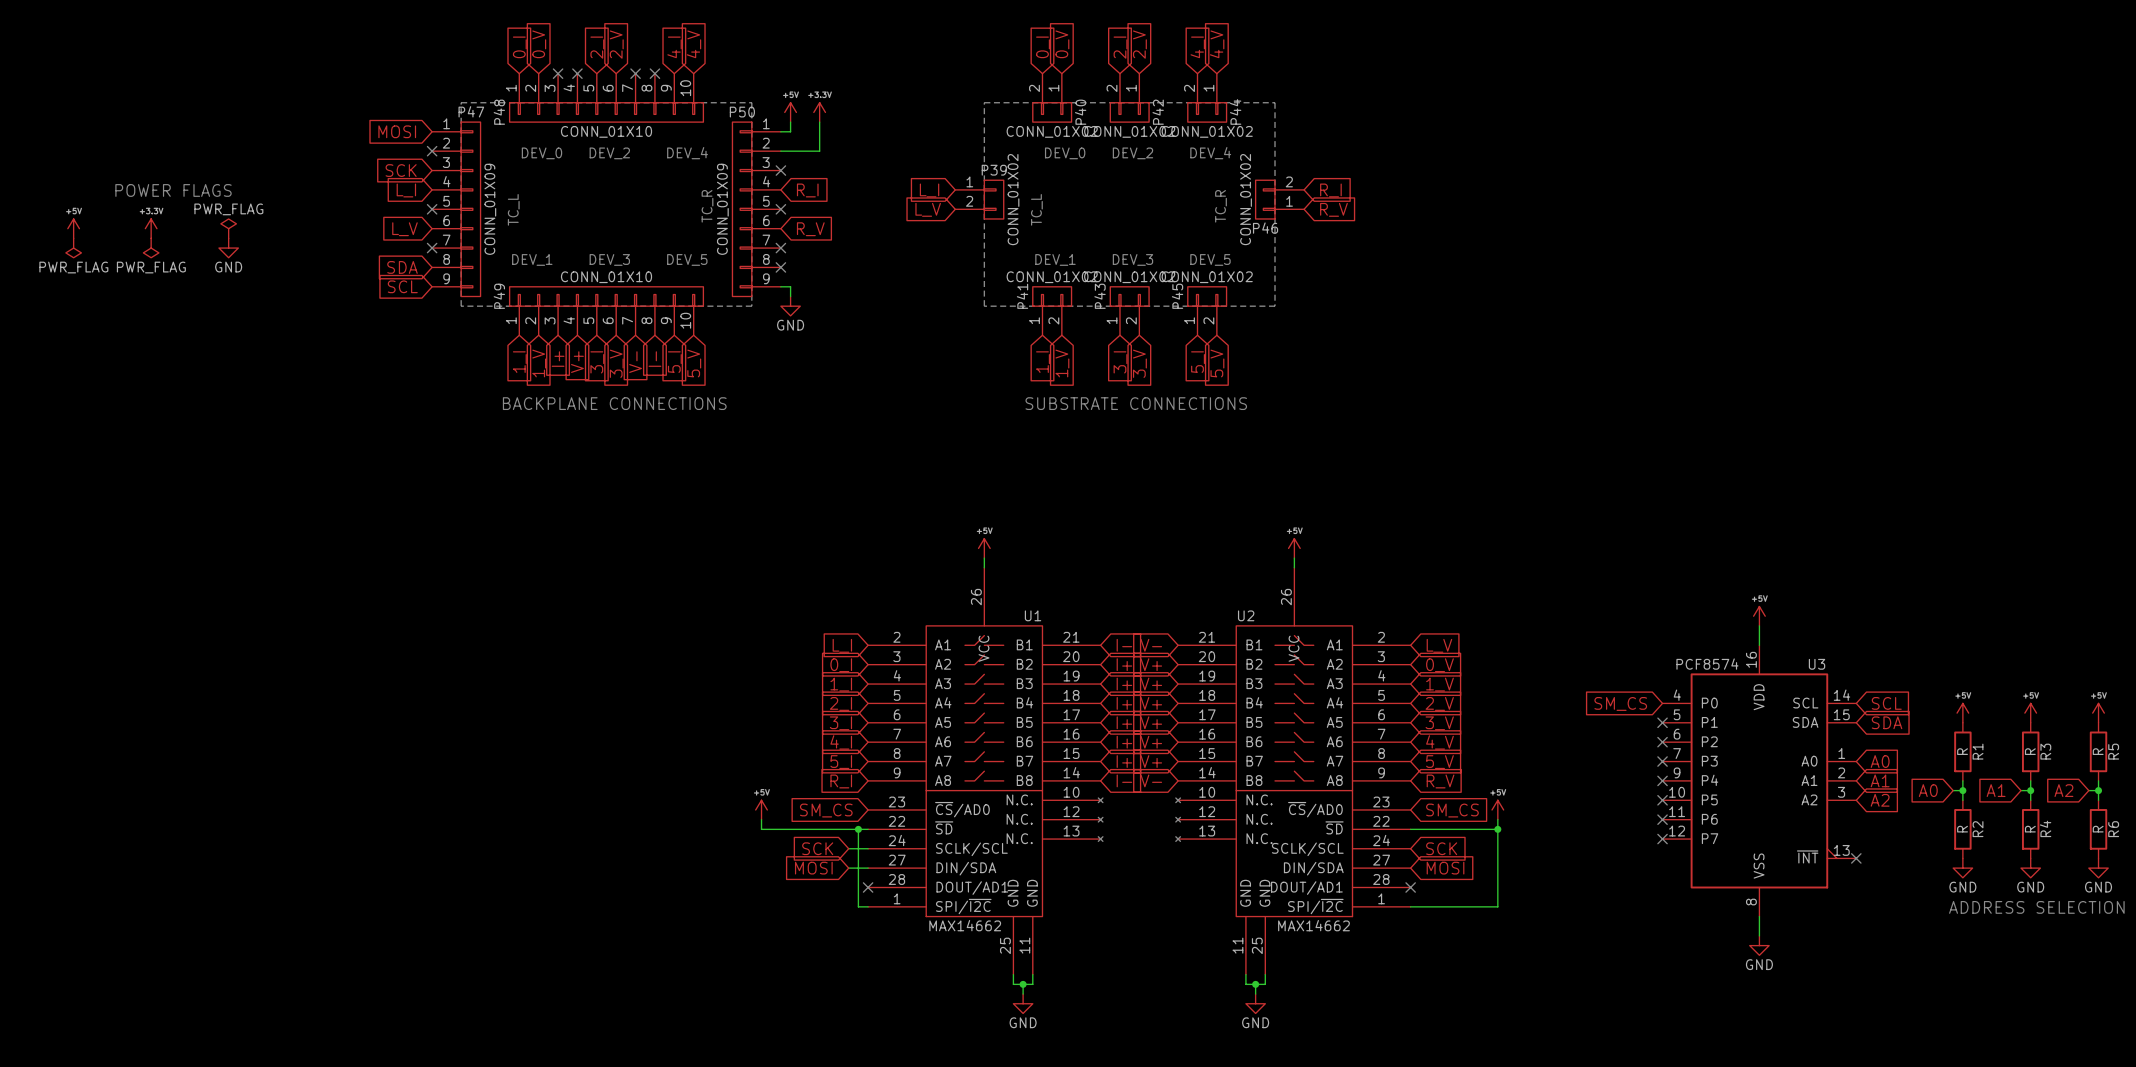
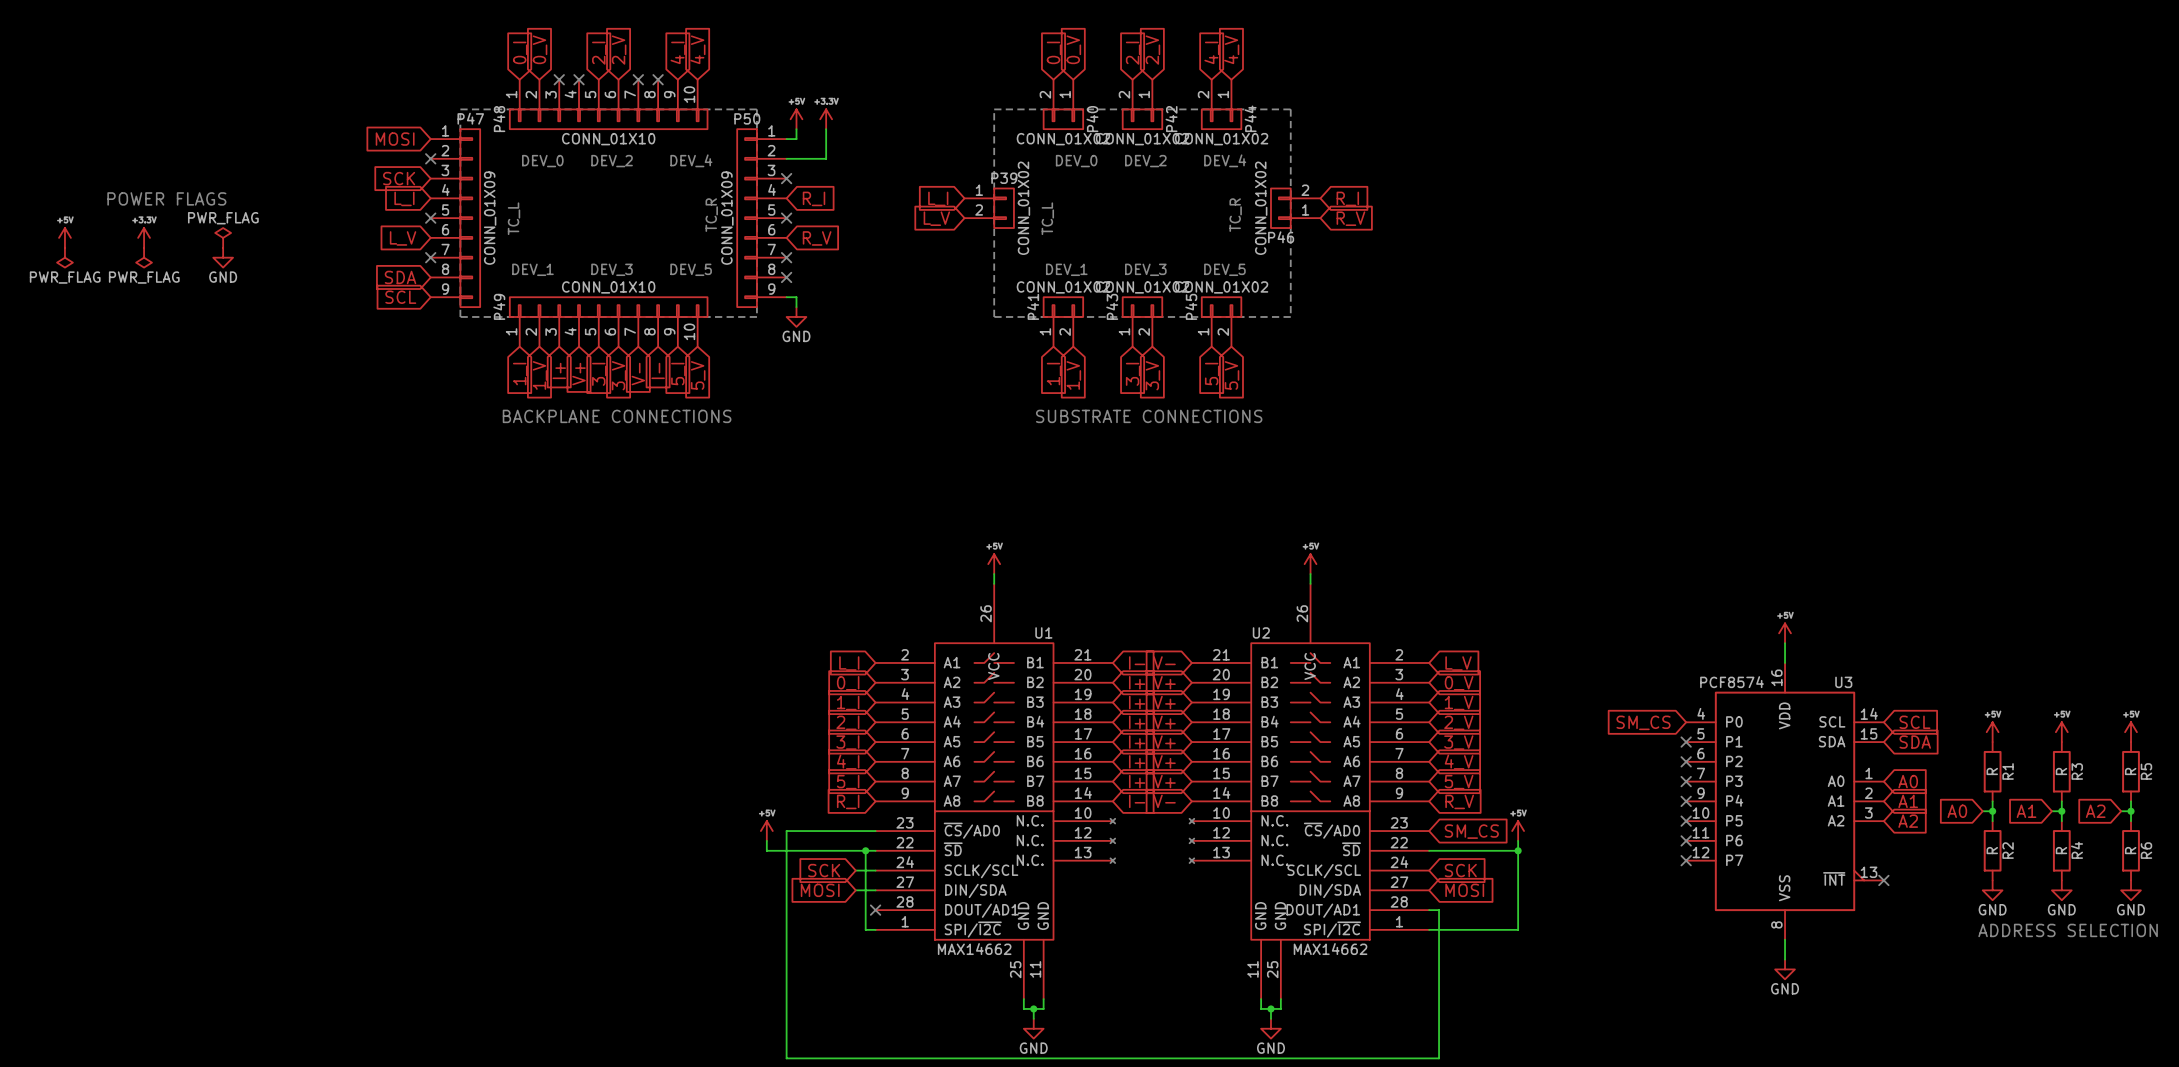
wire: none -> (875, 831) (786, 831) (786, 1058) (1439, 1058) (1439, 910) (1429, 910)
global label: SM_CS (826, 810) -> none
no-connect mark: (1410, 887) -> none

